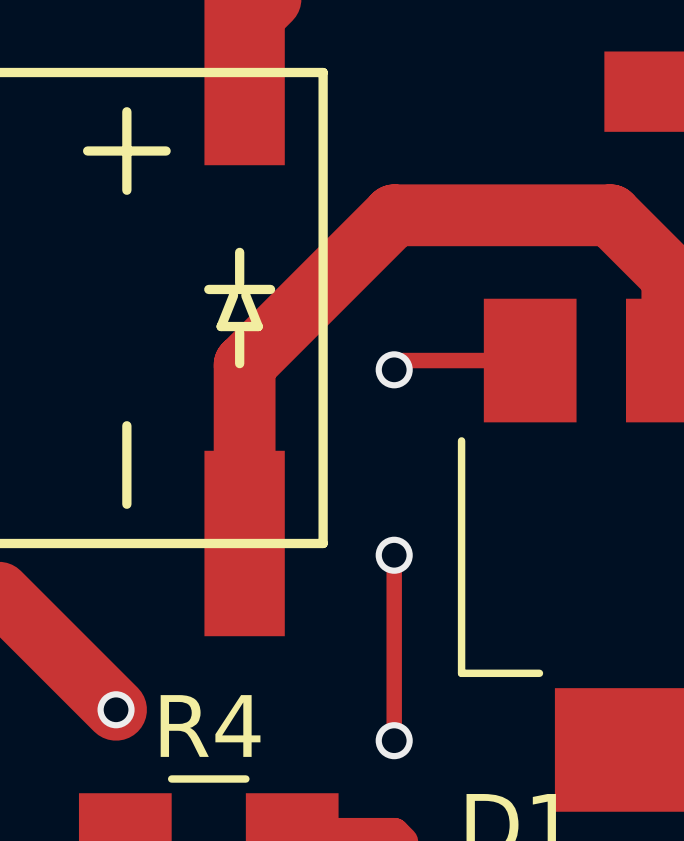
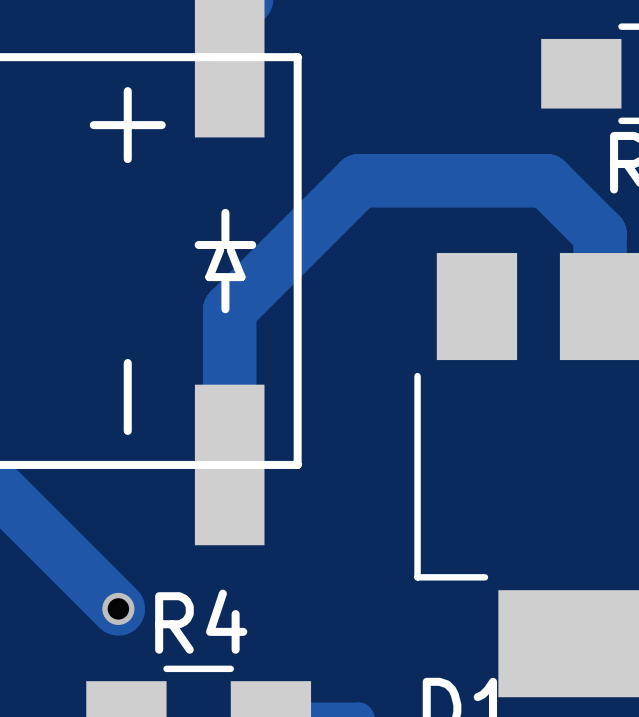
track: (530, 360) (403, 360) (394, 369) -> none
via: (394, 369) -> none
track: (394, 555) (394, 740) -> none
via: (394, 555) -> none
via: (394, 740) -> none

